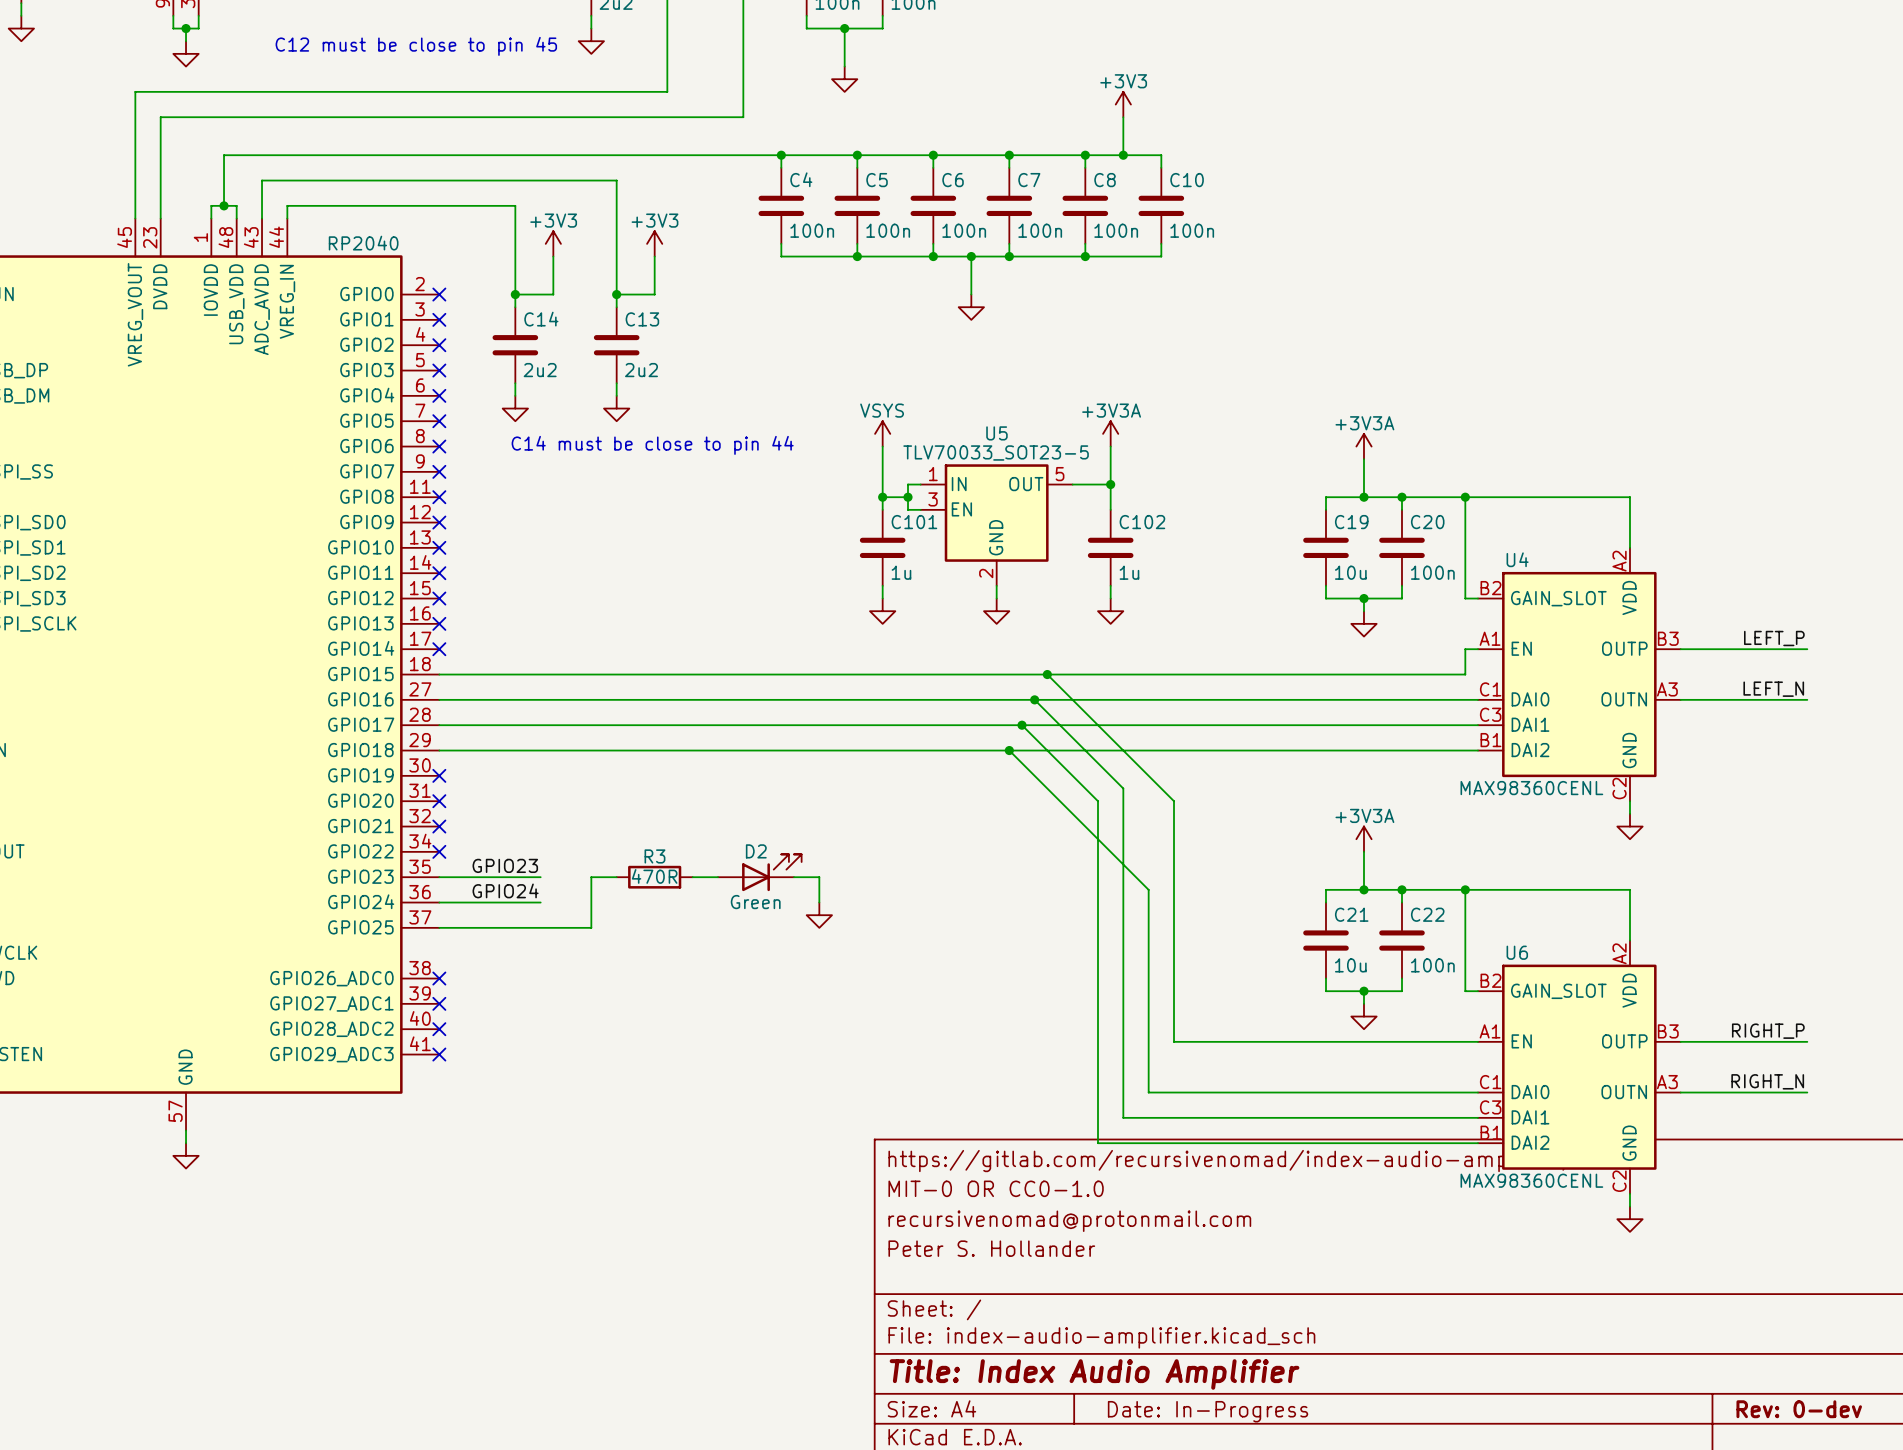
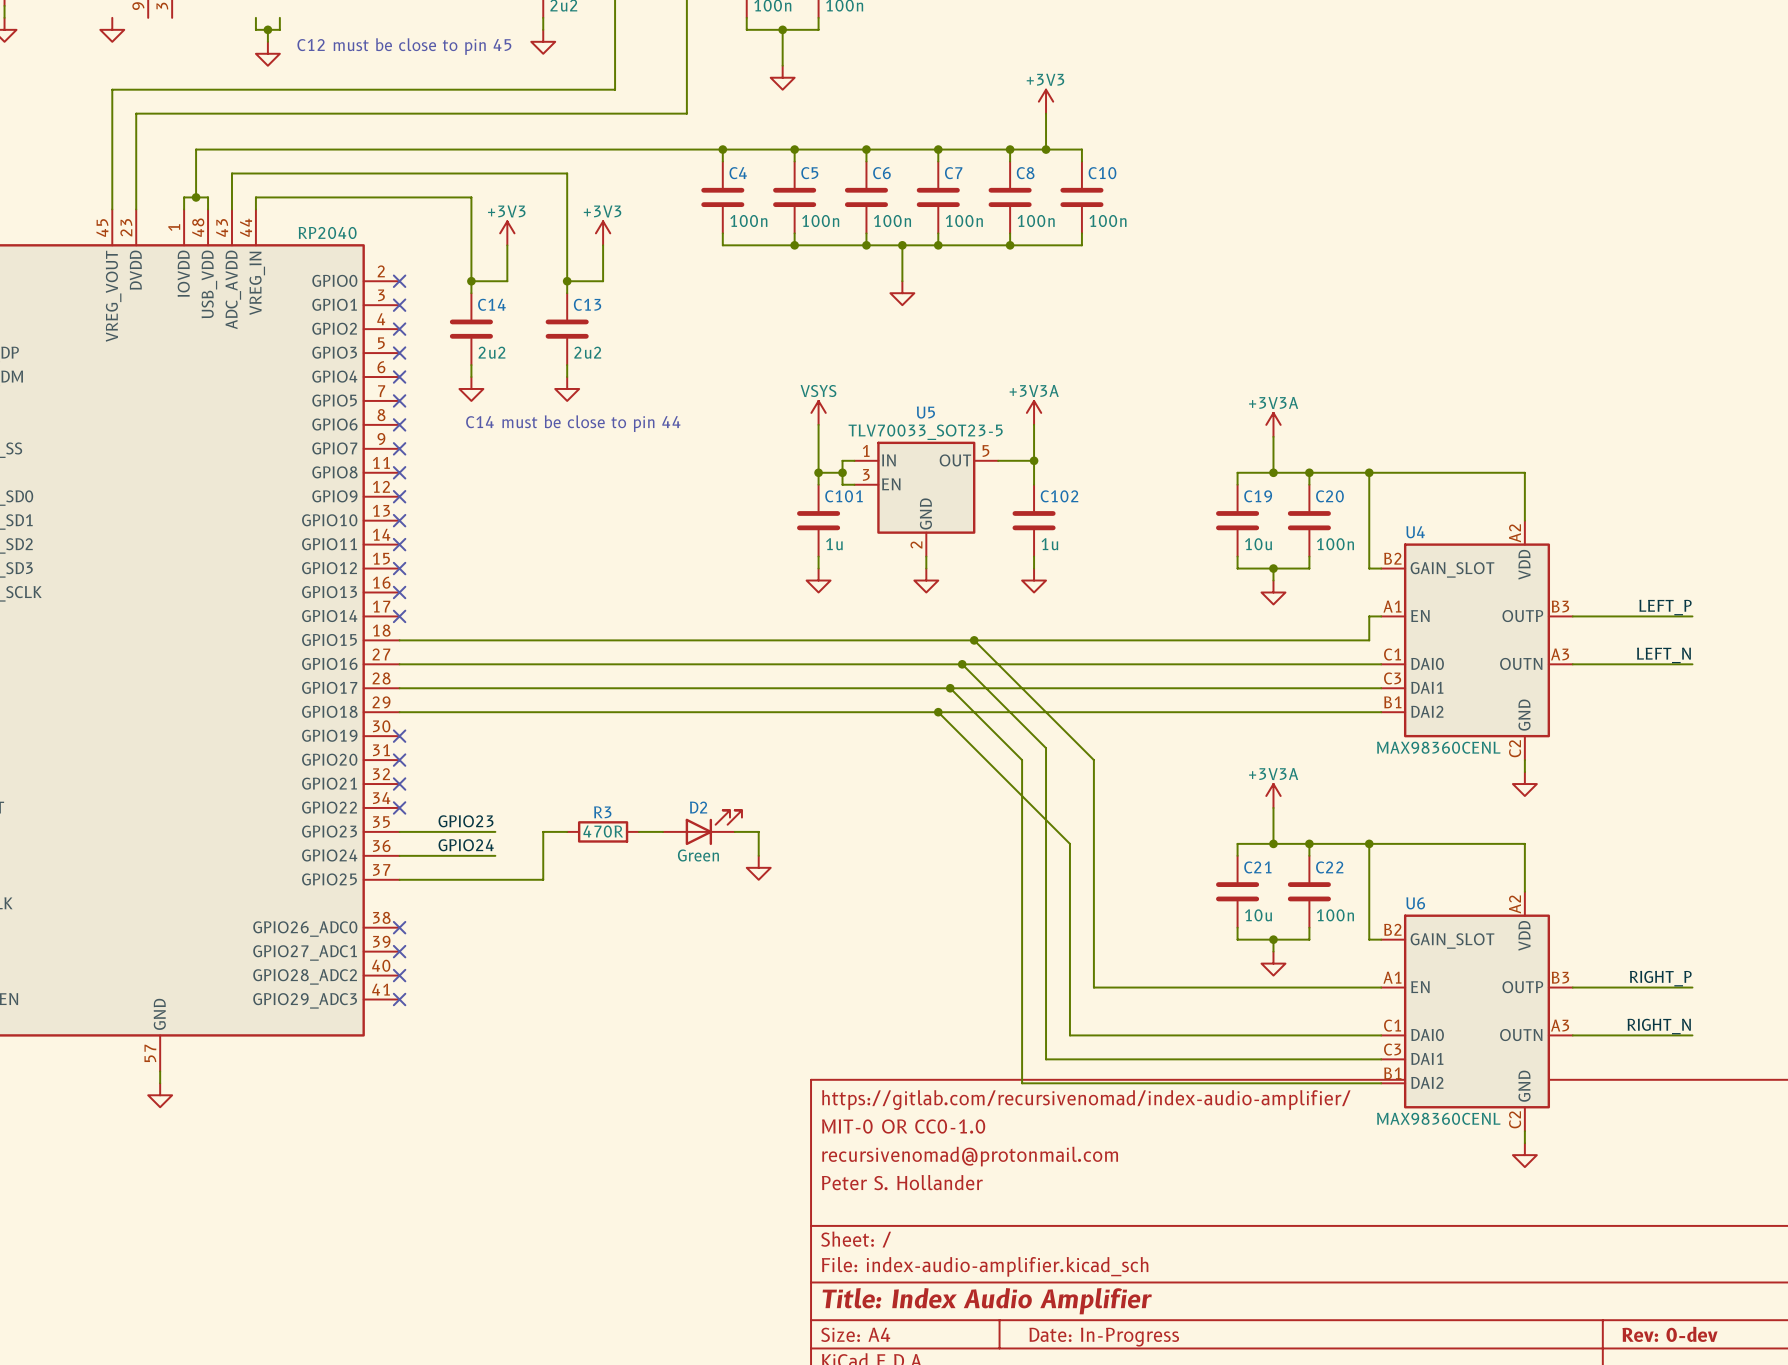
wire: (173, 15) (173, 28) (198, 28) (198, 15) -> (255, 17) (255, 29) (279, 29) (279, 17)
wire: (186, 28) (186, 41) -> (267, 29) (267, 41)
junction: (186, 28) -> none
junction: none -> (267, 29)
power symbol position: (186, 53) -> (112, 29)
power symbol: none -> (267, 53)

